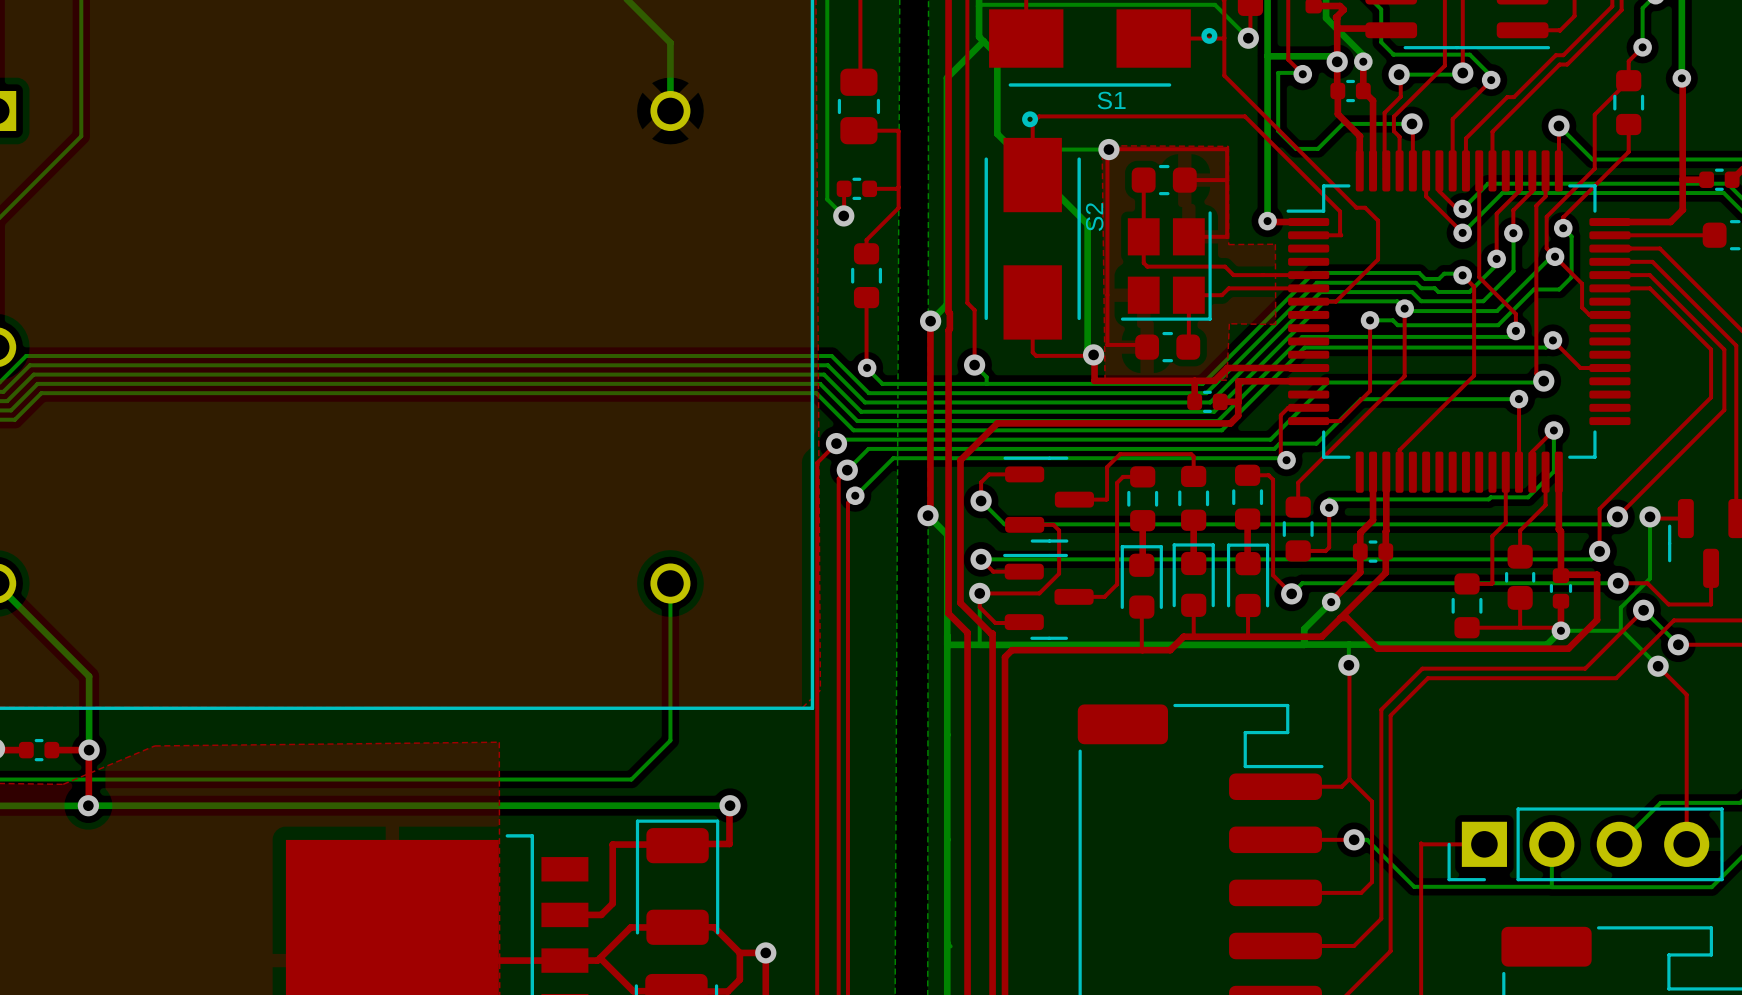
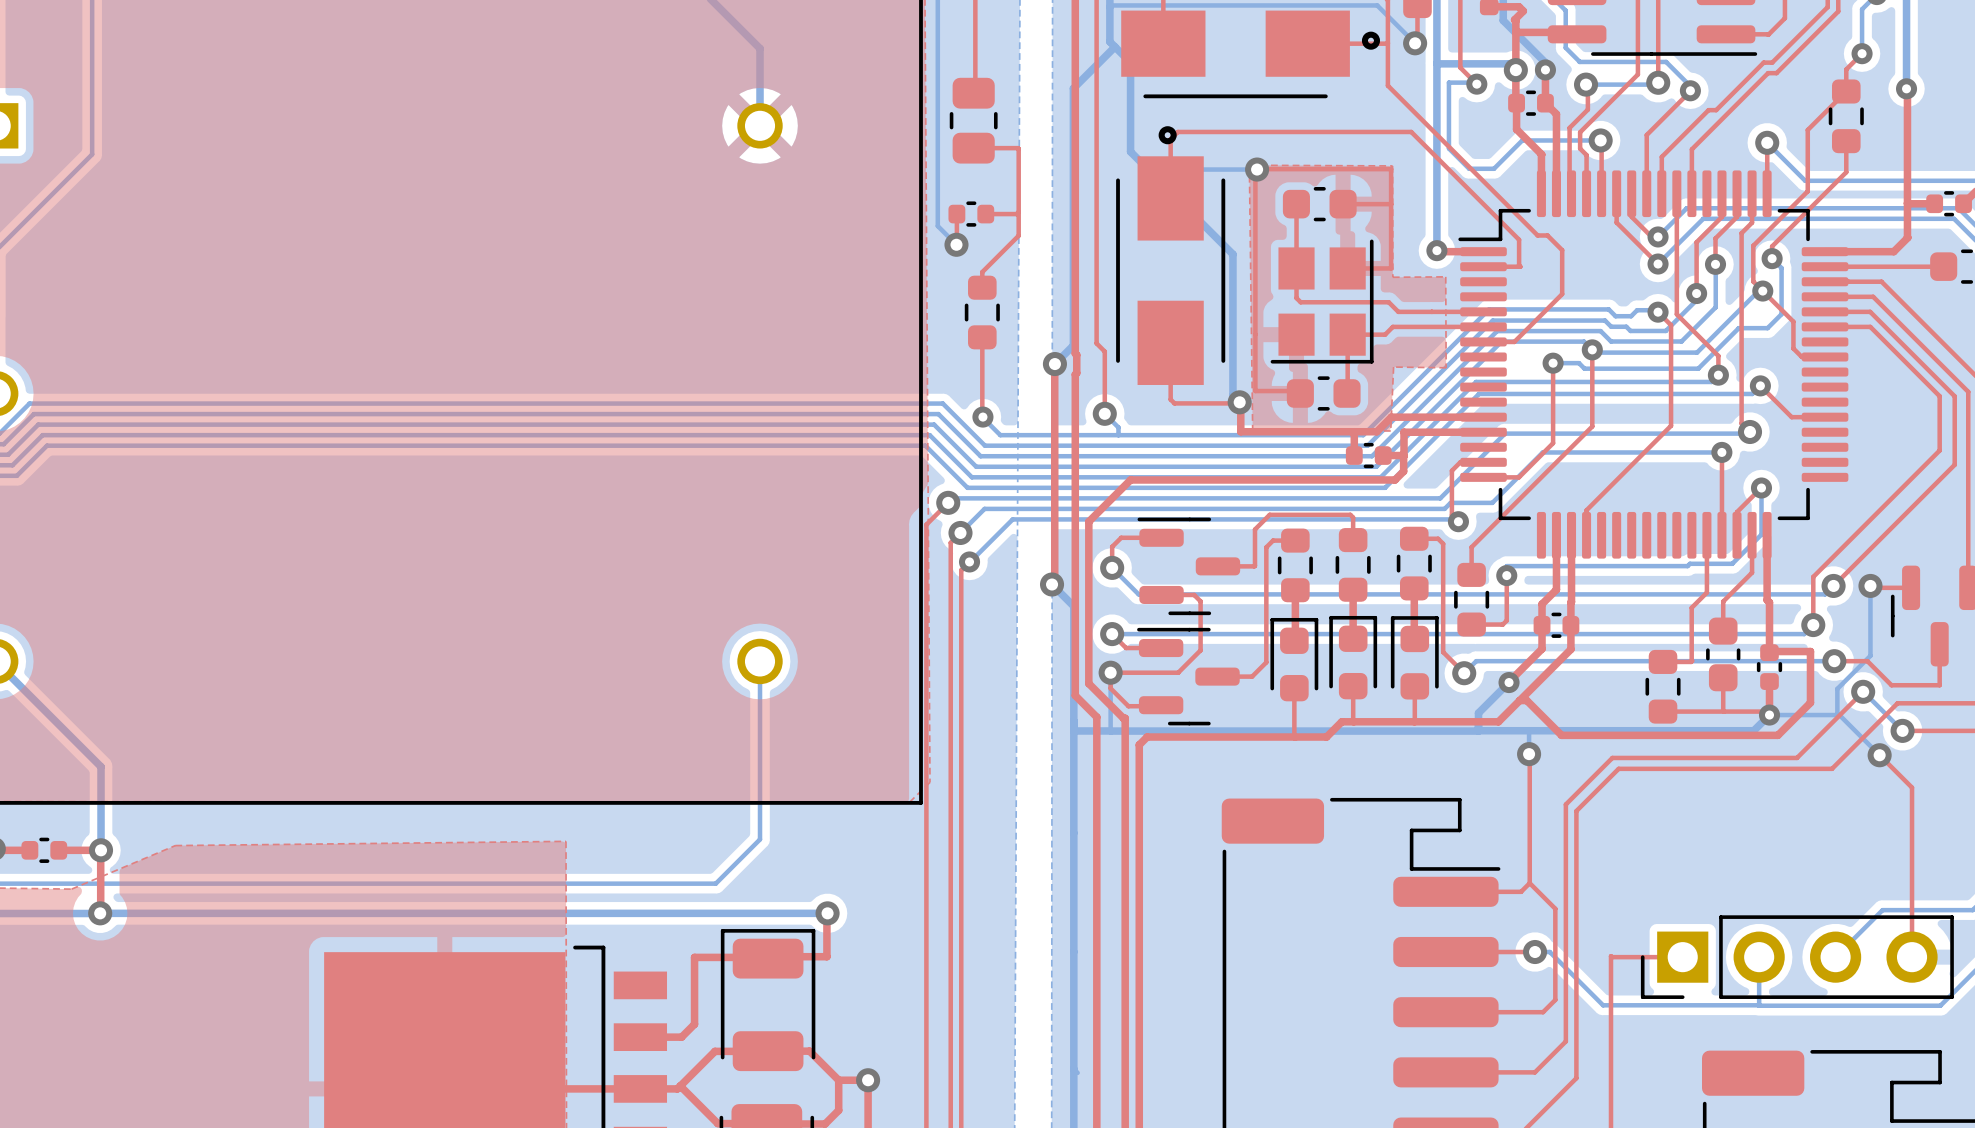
S1 name: S1 (1111, 100) -> none
S2 name: S2 (1094, 217) -> none

